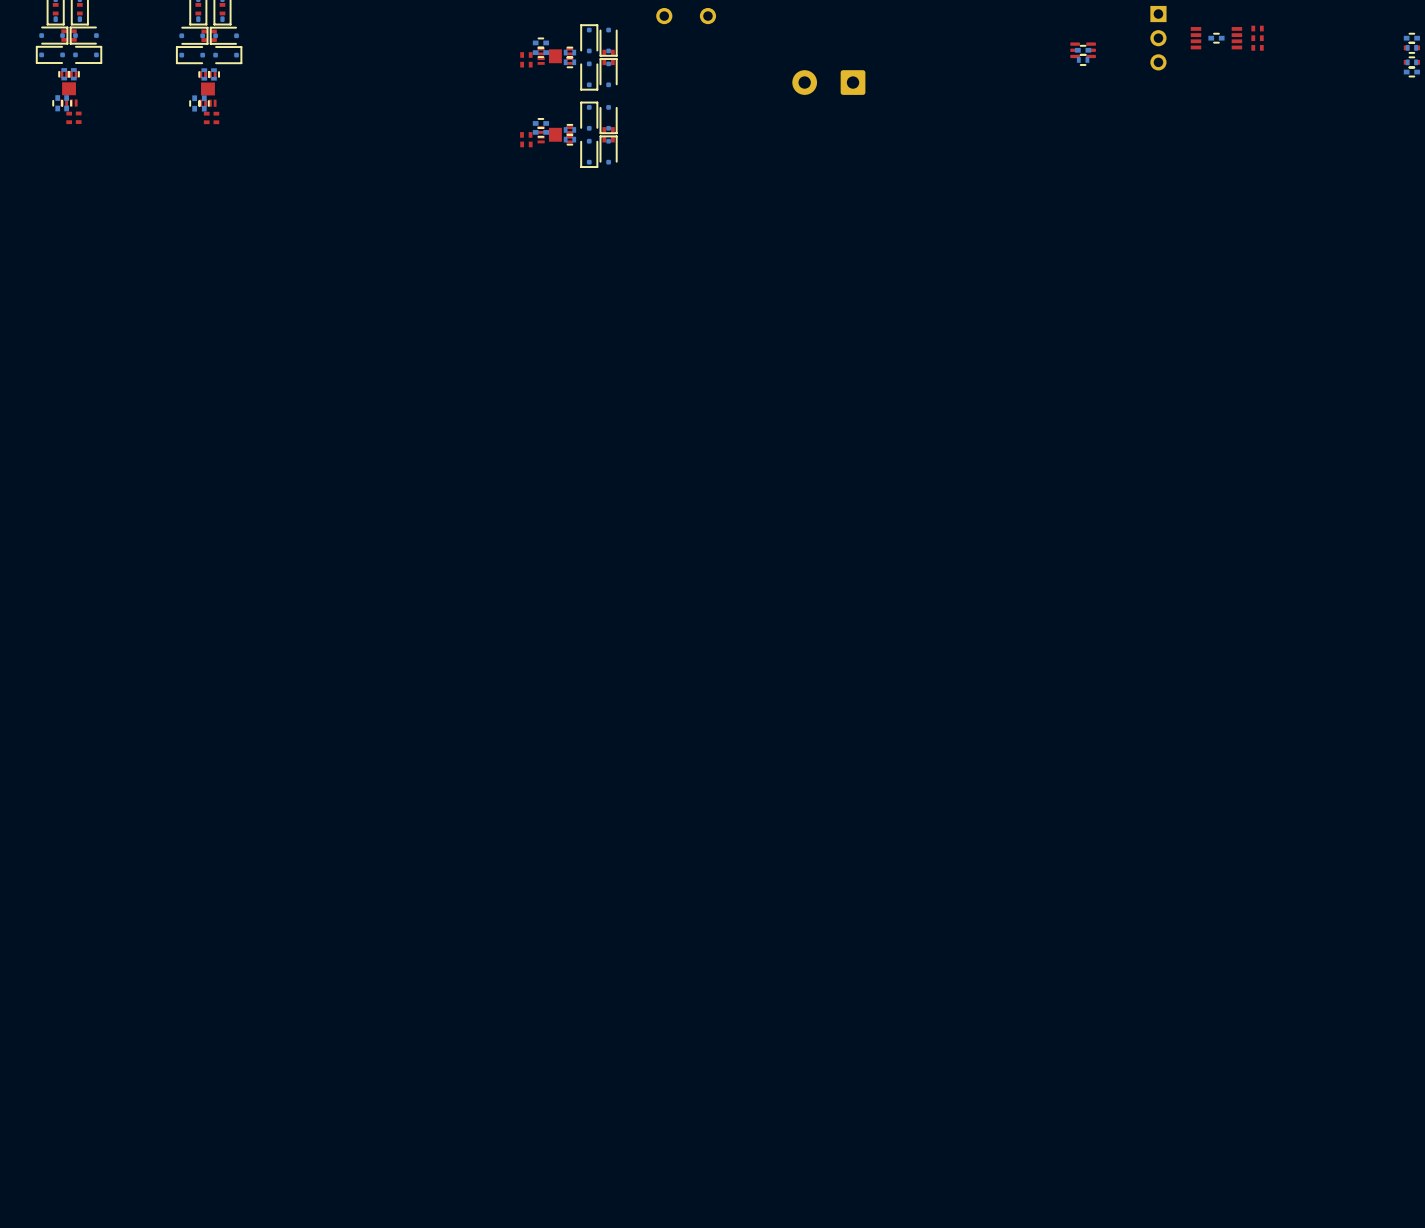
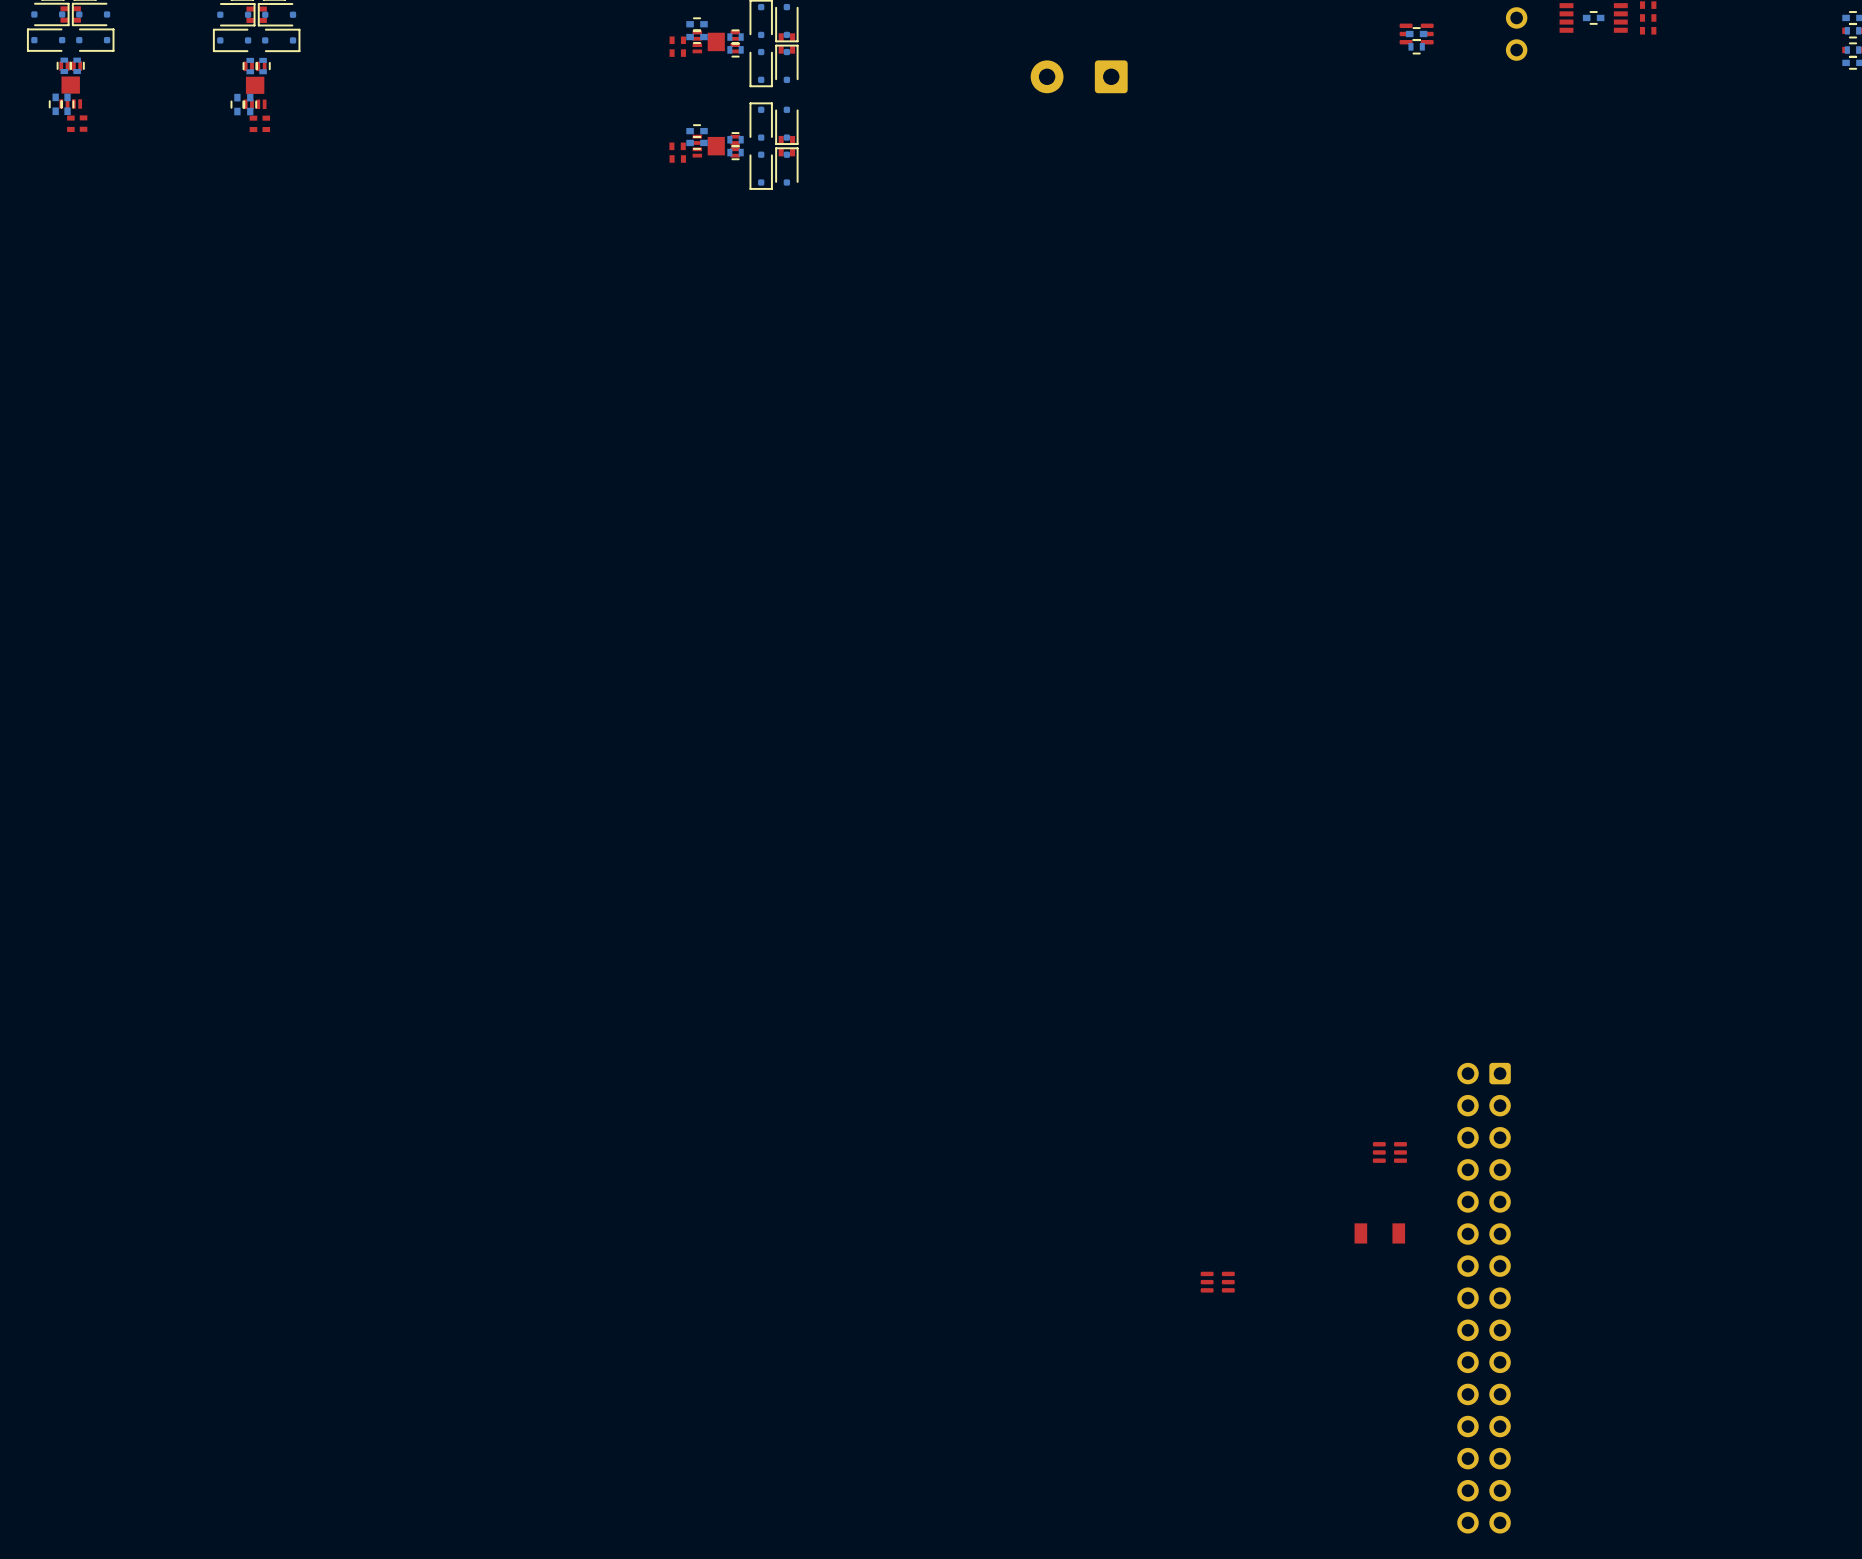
part: none -> (1389, 1152)
part: none -> (1379, 1233)
part: none -> (1217, 1282)
part: none -> (1484, 1298)

